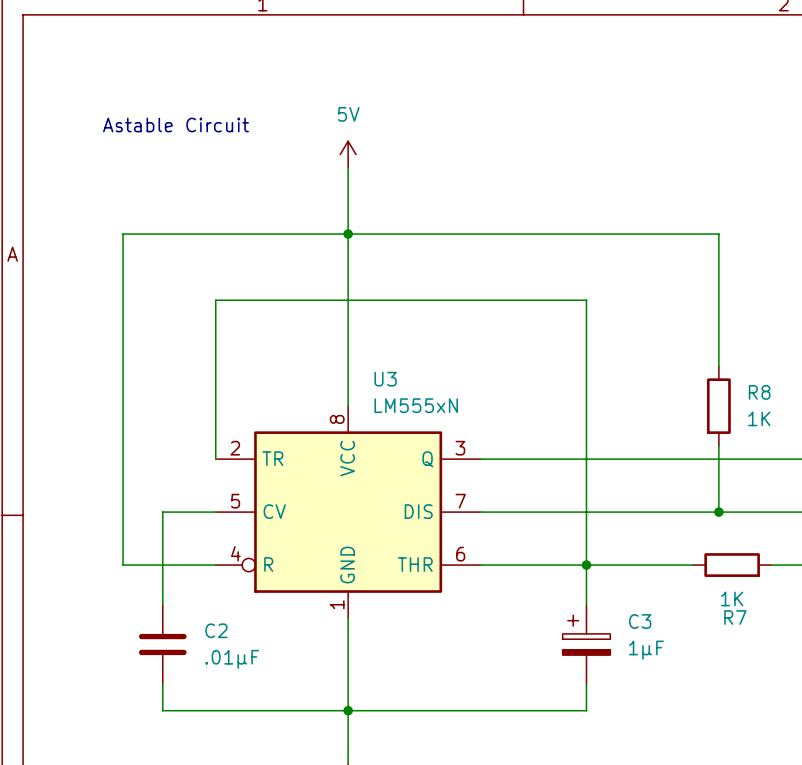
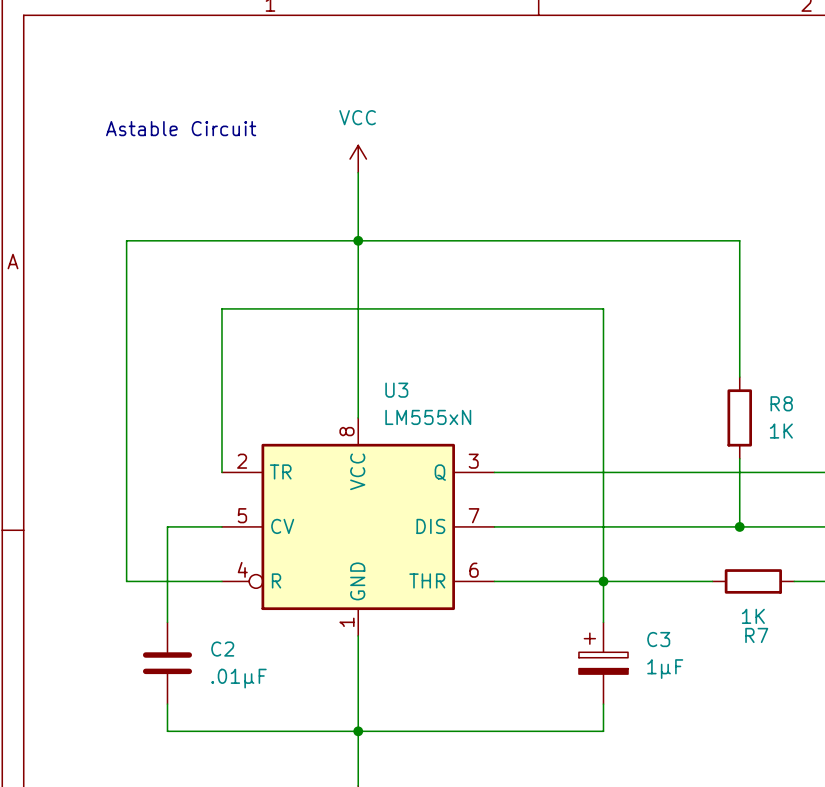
power symbol: 5V (348, 154) -> VCC (358, 159)

